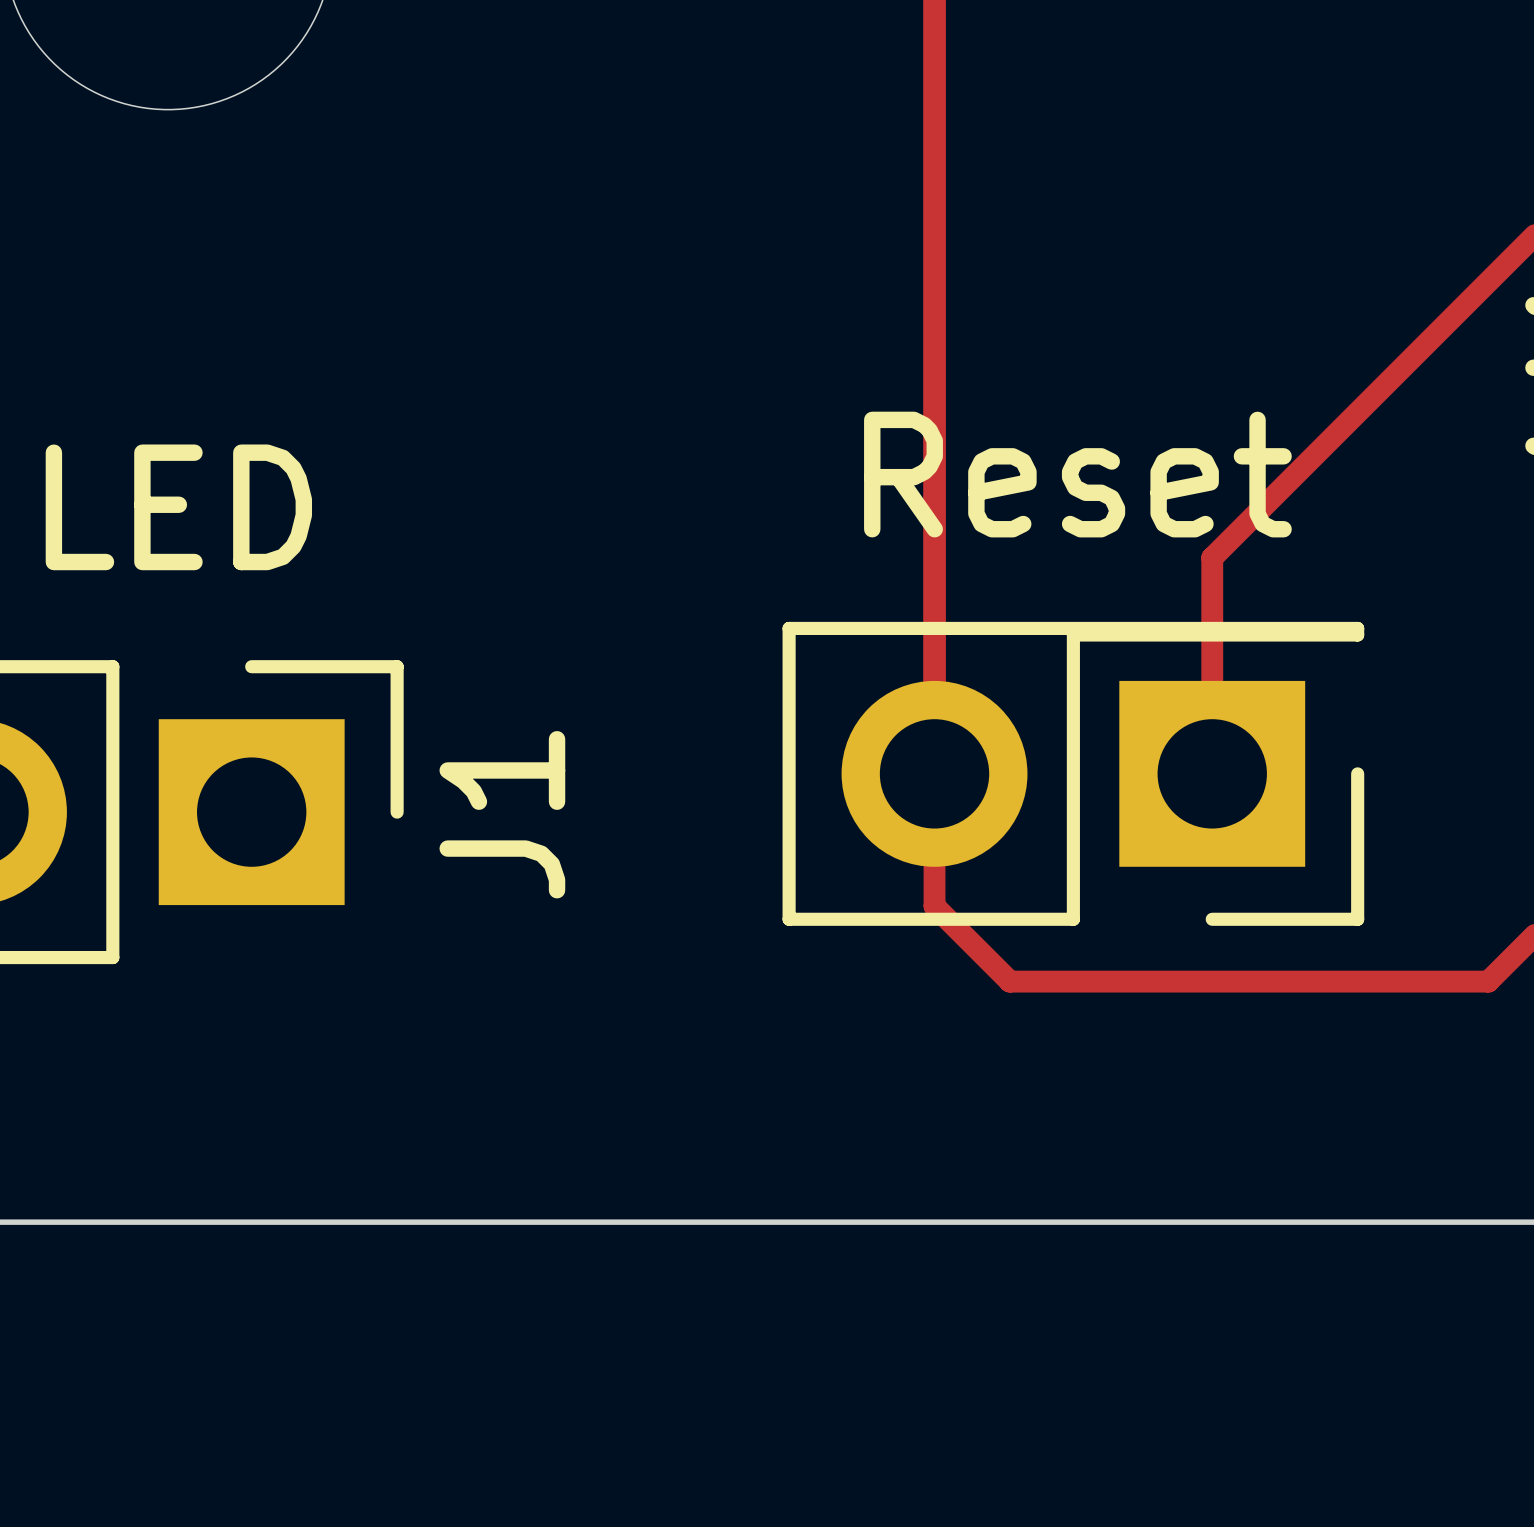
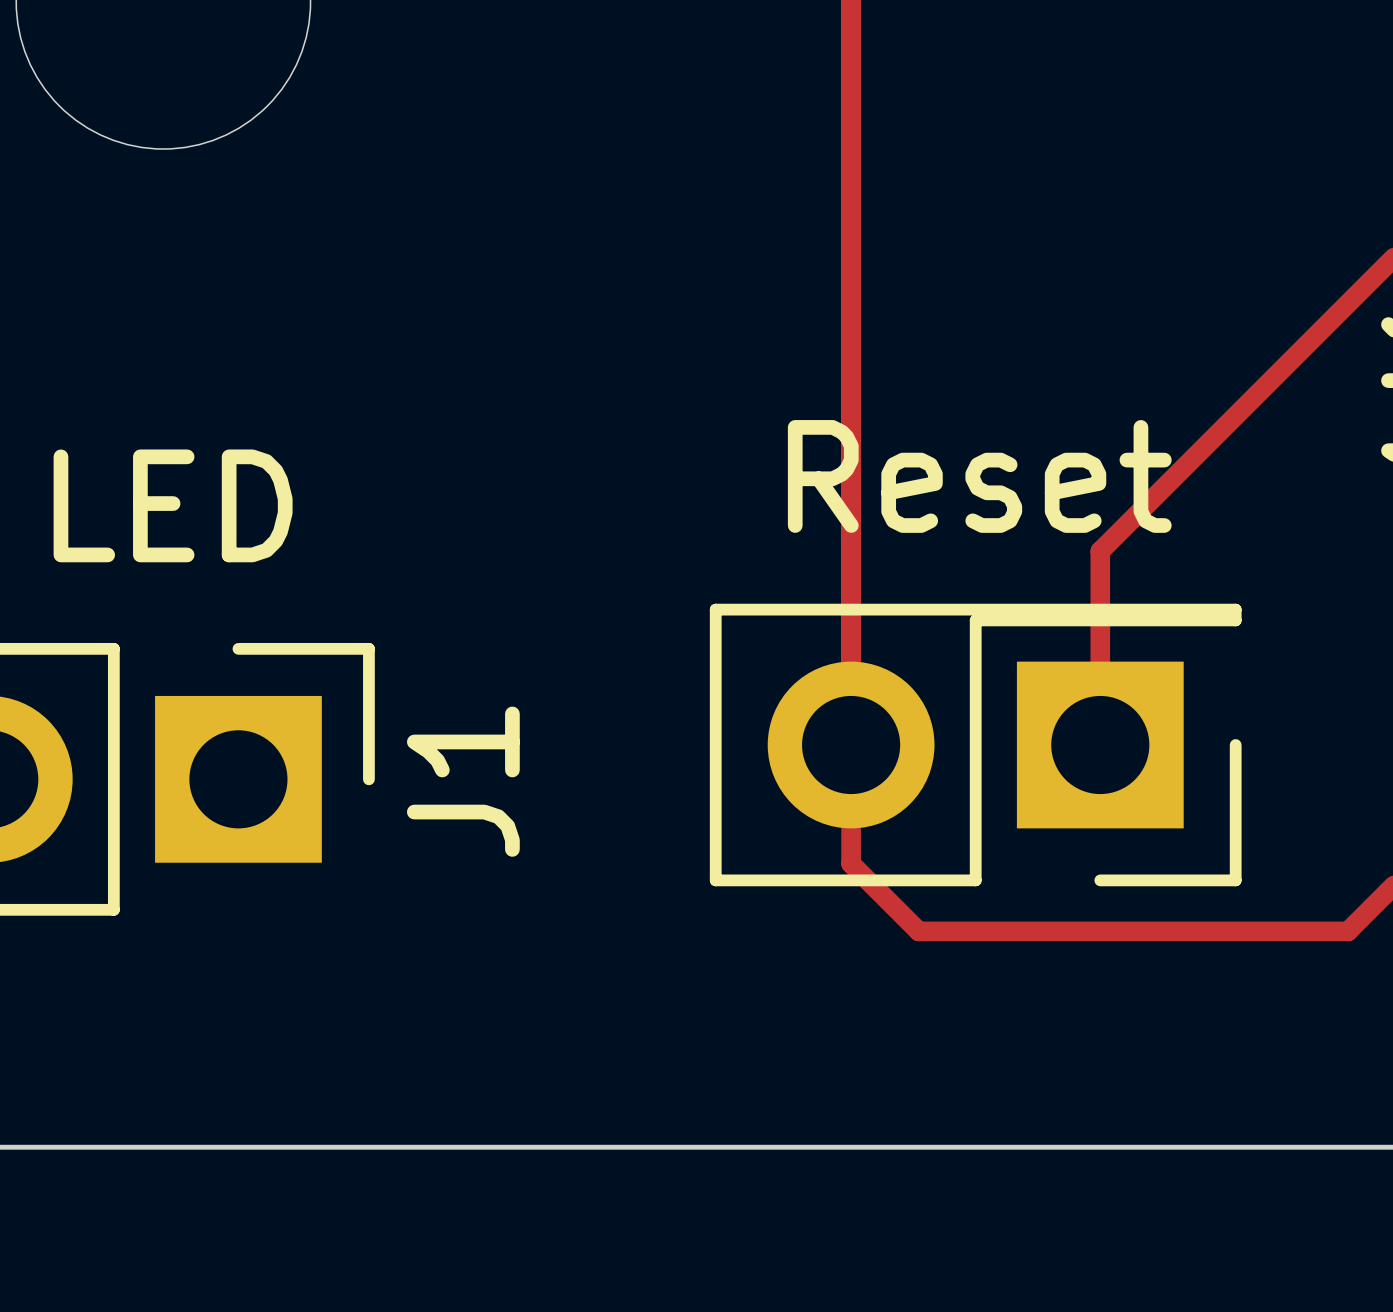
part footprint: [782, 621, 1365, 926] -> [709, 603, 1242, 887]

